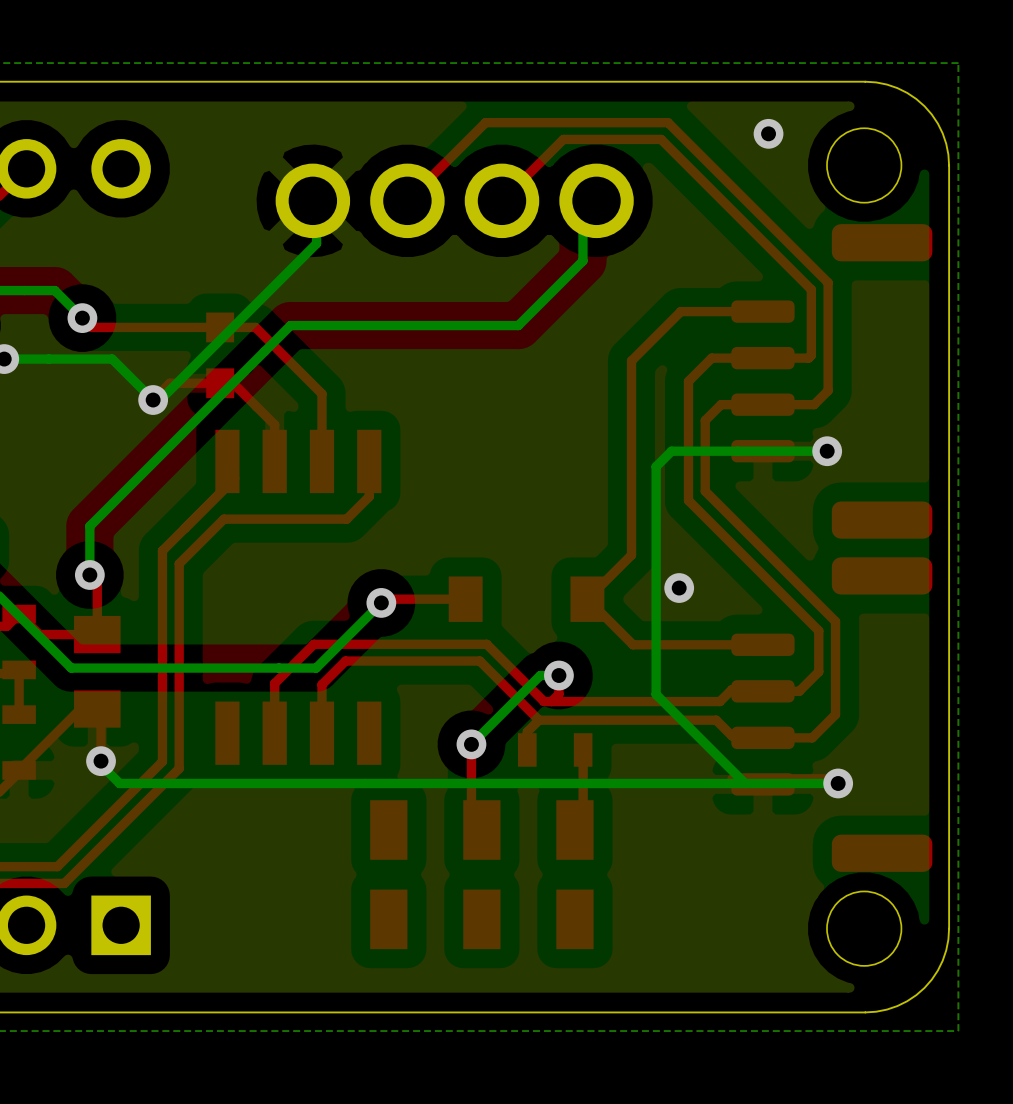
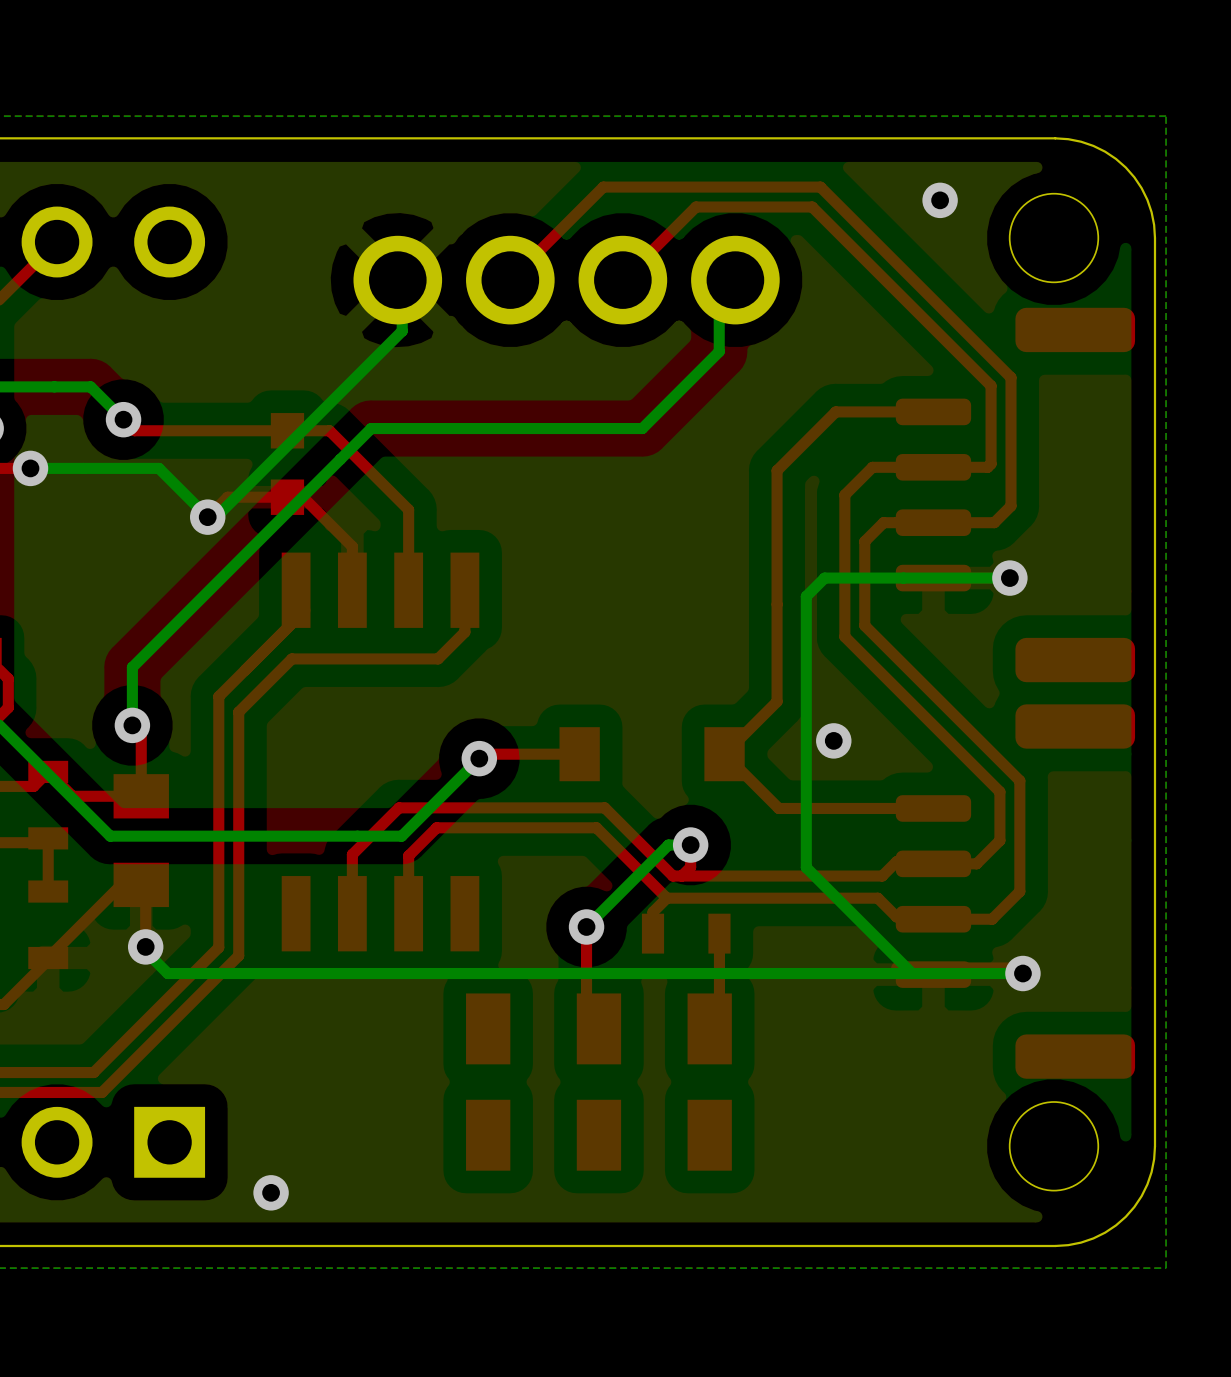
via: none -> (271, 1192)

